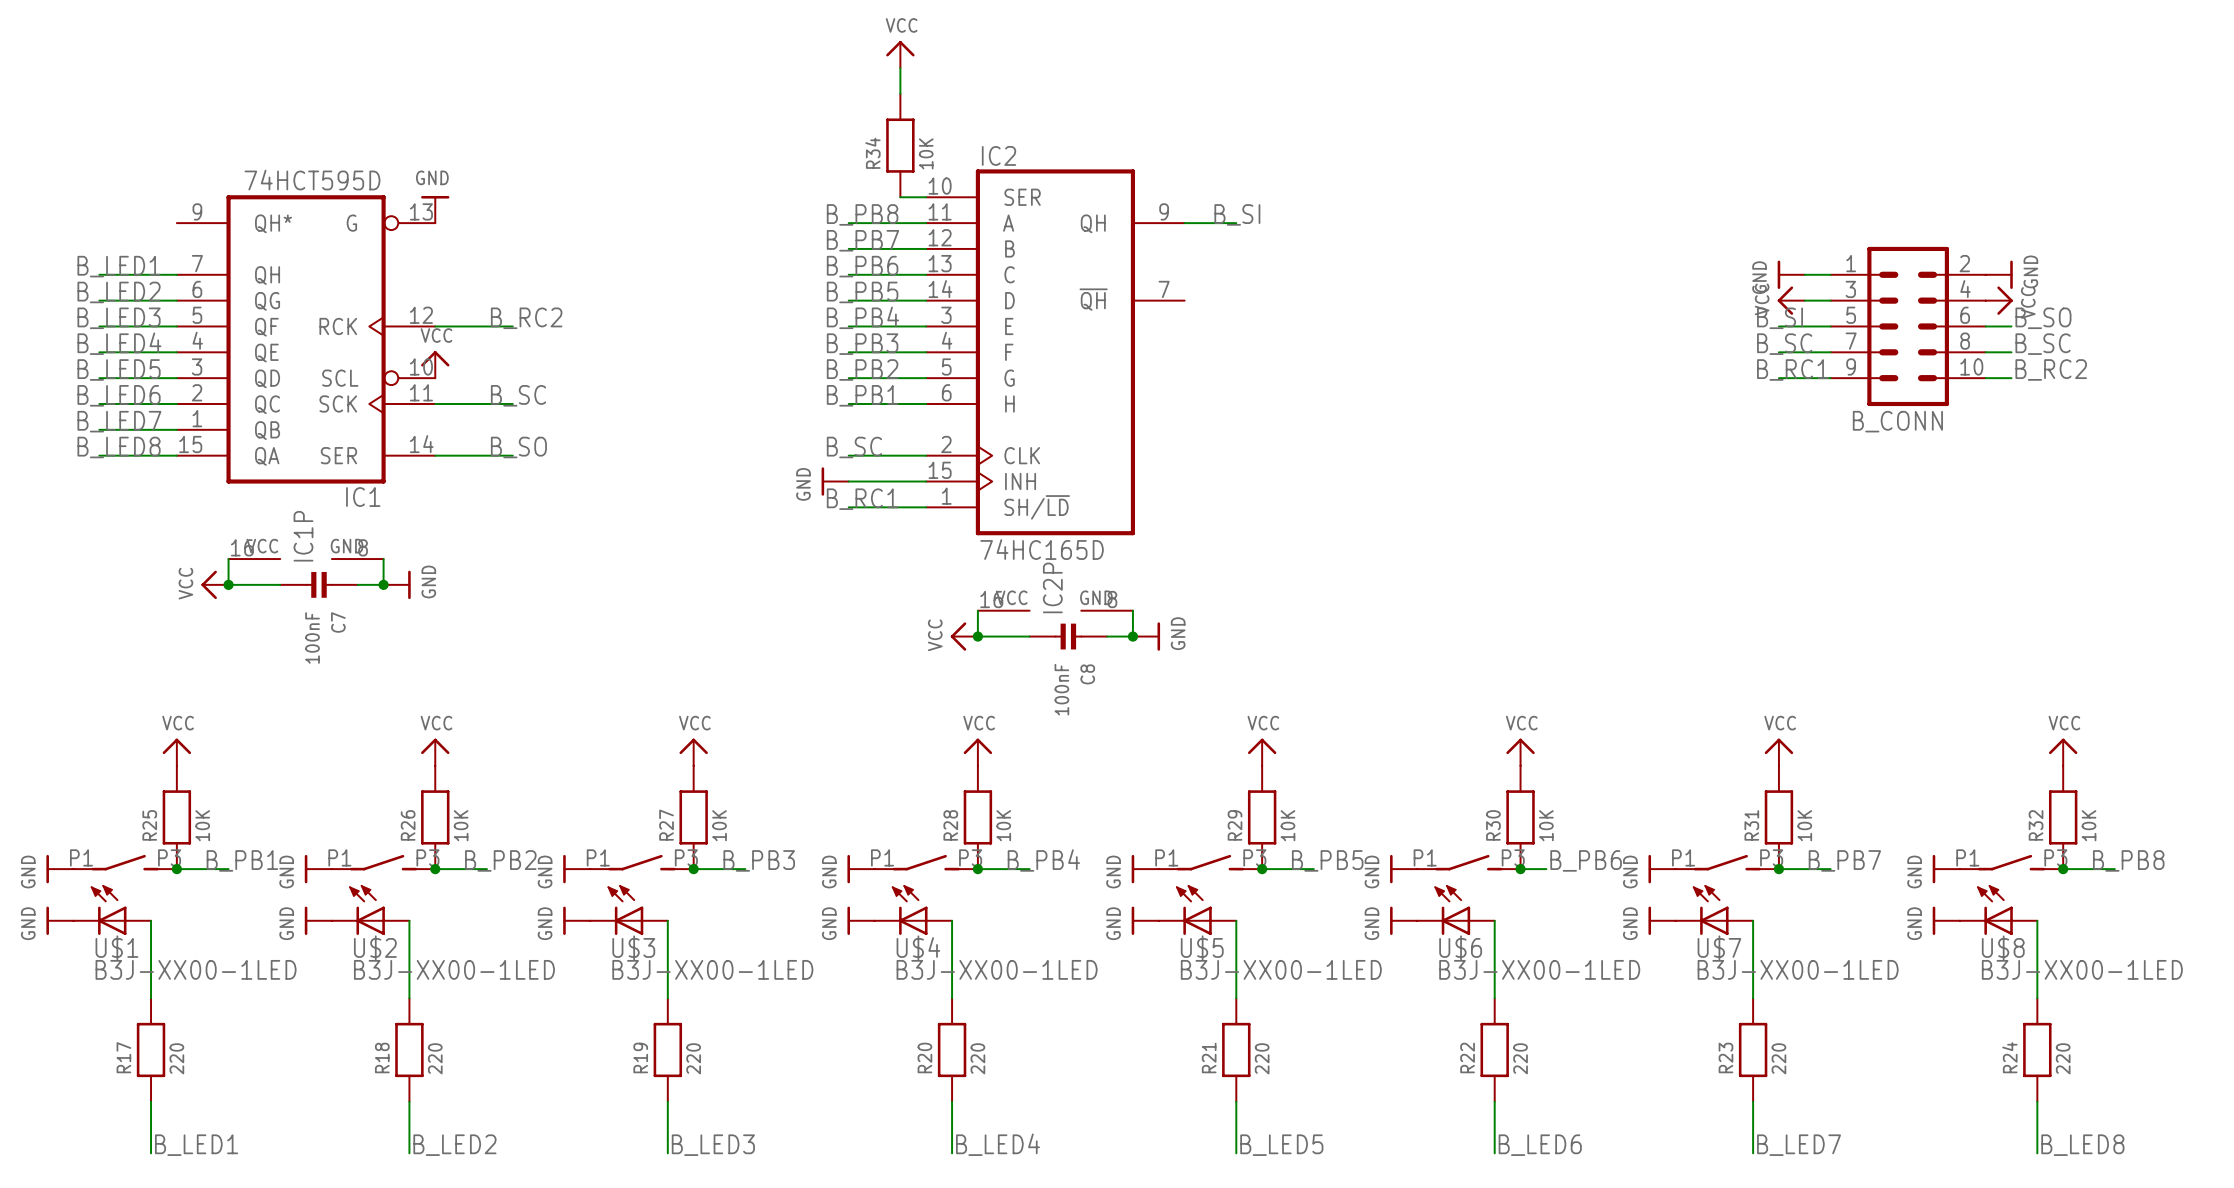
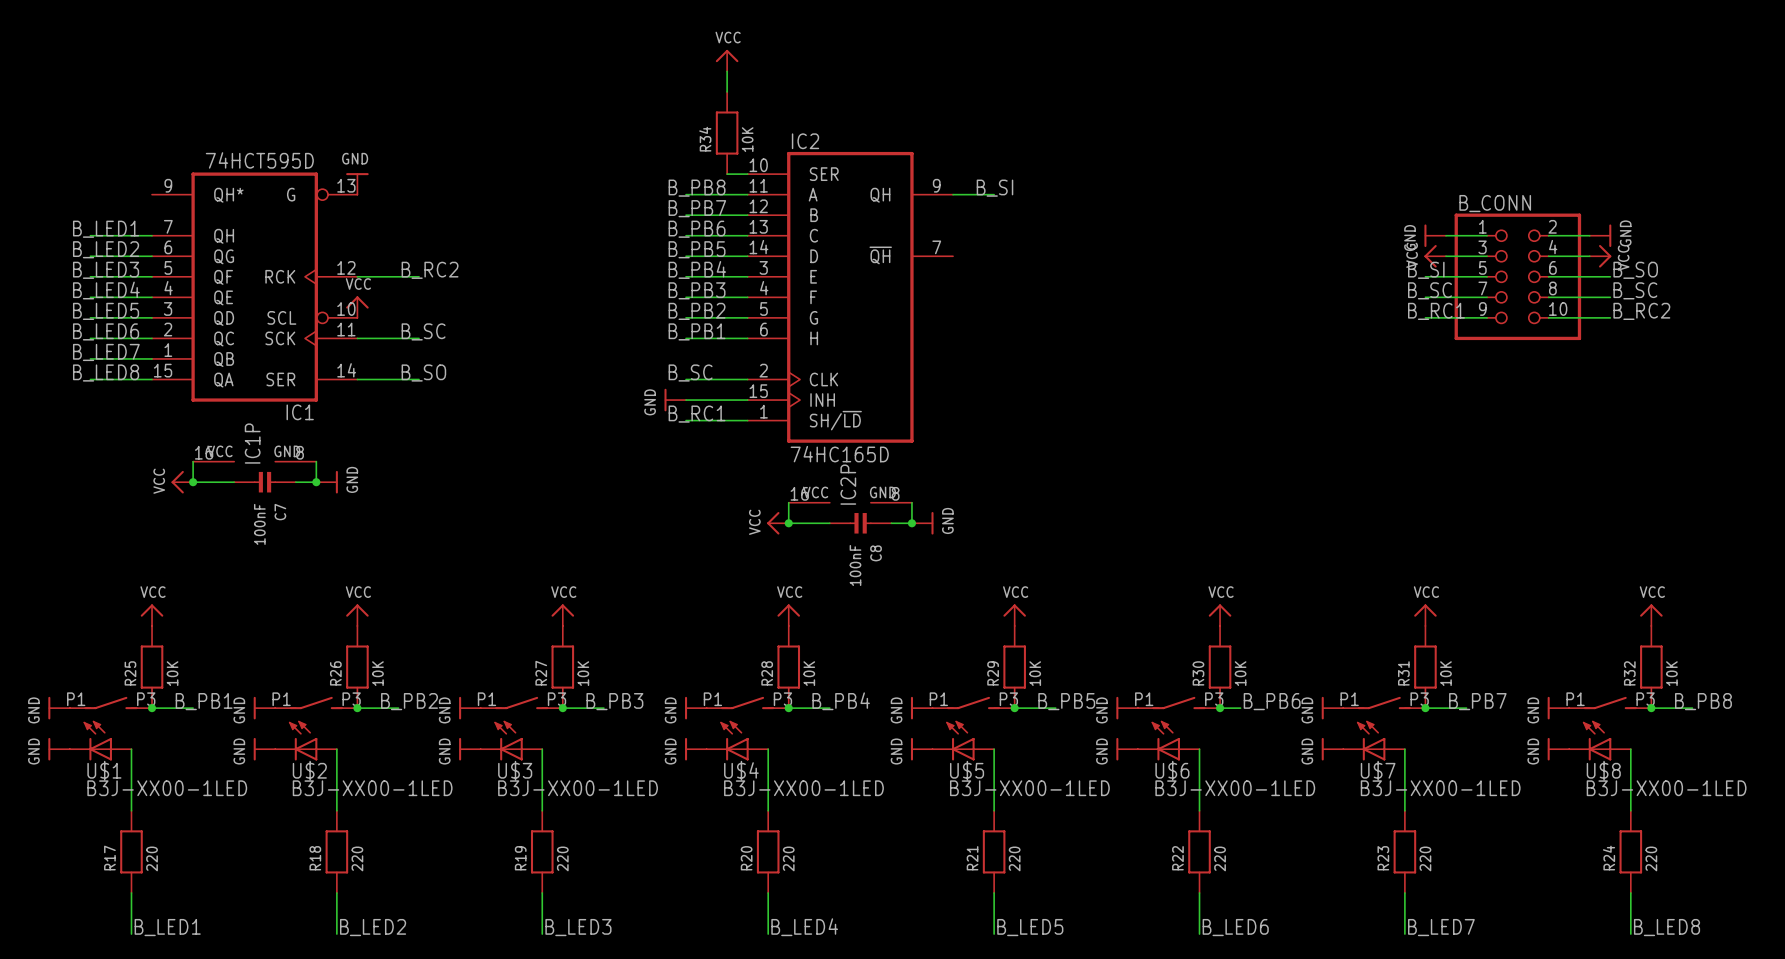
B_CONN: none -> (1517, 276)
B_CONN: (1908, 326) -> none

